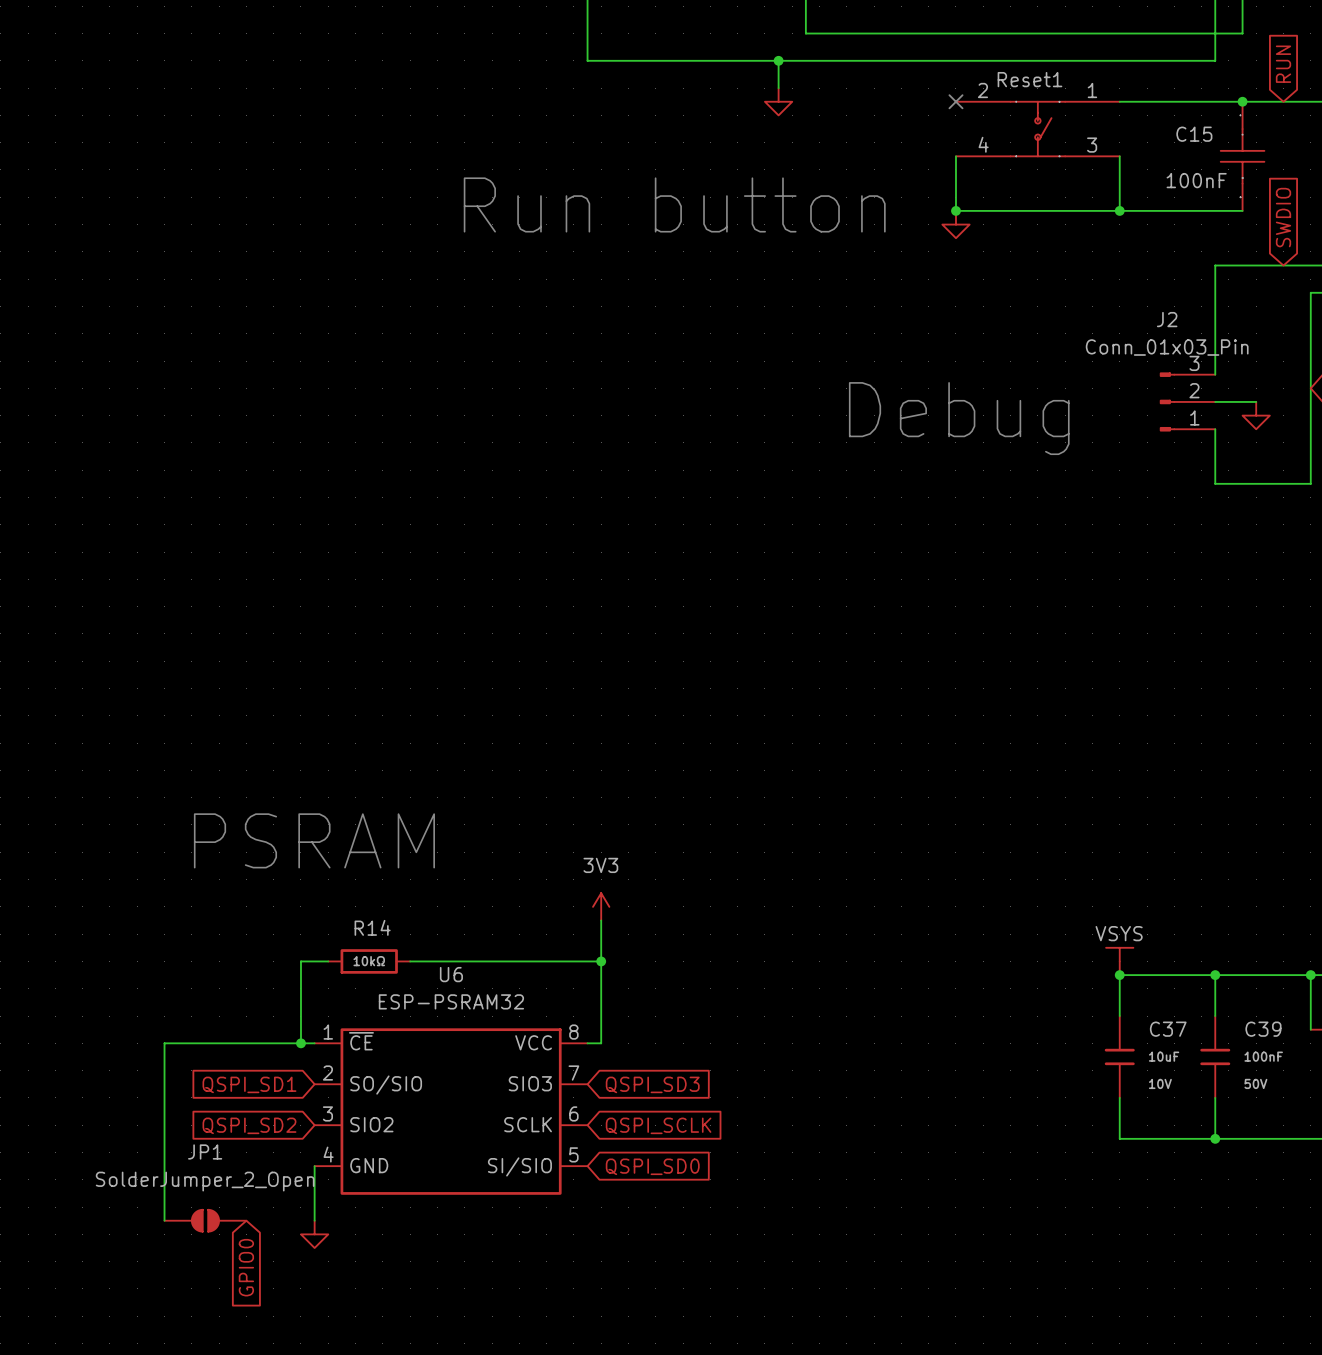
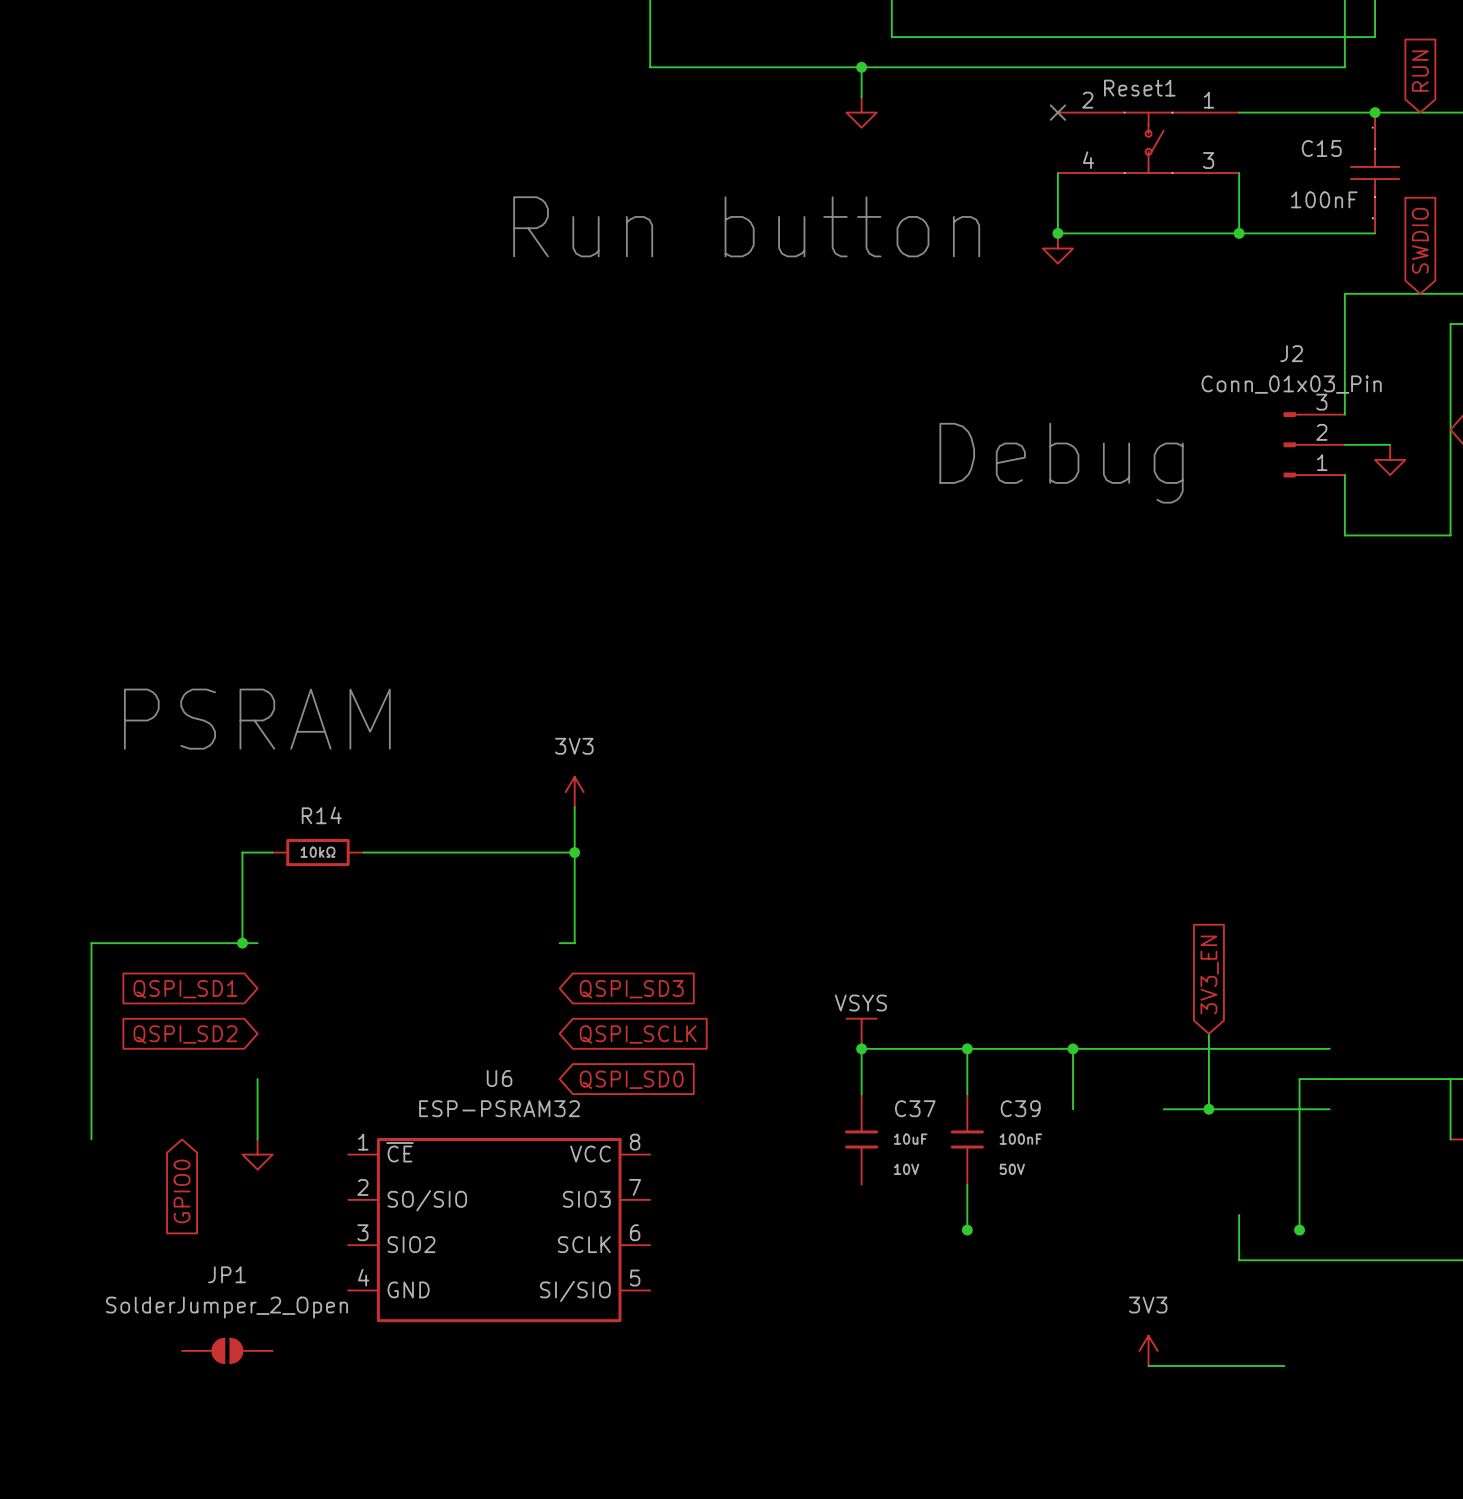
junction: none -> (574, 852)
text position: PSRAM (314, 840) -> PSRAM (257, 719)
junction: none -> (242, 943)
global label: none -> 3V3_EN (1209, 974)
power symbol position: 3V3 (601, 906) -> 3V3 (574, 792)
wire: (601, 920) (601, 1043) (587, 1043) -> (574, 807) (574, 943) (559, 943)
power symbol: none -> VSYS (861, 1033)
wire: none -> (1208, 1033) (1208, 1109)
junction: none -> (861, 1048)
wire: none -> (967, 1048) (967, 1094)
junction: none -> (967, 1048)
wire: none -> (1073, 1048) (1073, 1109)
junction: none -> (1073, 1048)
wire: none -> (1329, 1048) (861, 1048) (861, 1094)
wire: (328, 961) (300, 961) (300, 1043) -> (272, 852) (242, 852) (242, 943)
R14 position: (369, 961) -> (317, 852)
wire: (410, 961) (601, 961) -> (363, 852) (574, 852)
junction: (601, 961) -> none
power symbol: VSYS (1119, 961) -> none
junction position: (1119, 975) -> (1208, 1109)
wire: (1174, 975) (1119, 975) (1119, 1016) -> (1299, 1079) (1299, 1230)
wire: (1215, 975) (1215, 1016) -> none
junction: (1215, 975) -> none
junction: (1310, 975) -> none
wire: none -> (1163, 1109) (1329, 1109)
junction: (300, 1043) -> none
wire: (314, 1043) (164, 1043) (164, 1220) -> (257, 943) (91, 943) (91, 1139)
C37 position: (1119, 1056) -> (861, 1139)
C39 position: (1215, 1056) -> (967, 1139)
wire: none -> (967, 1184) (967, 1230)
global label position: QSPI_SD1 (249, 1084) -> QSPI_SD1 (185, 989)
global label position: QSPI_SD3 (652, 1084) -> QSPI_SD3 (631, 989)
wire: (1215, 1097) (1215, 1138) -> none
junction: none -> (967, 1230)
global label position: QSPI_SD2 (249, 1125) -> QSPI_SD2 (185, 1034)
global label position: QSPI_SCLK (658, 1125) -> QSPI_SCLK (638, 1034)
junction position: (1215, 1138) -> (1299, 1230)
wire: (314, 1166) (314, 1220) -> (257, 1079) (257, 1139)
global label position: QSPI_SD0 (652, 1166) -> QSPI_SD0 (631, 1079)
power symbol: none -> 3V3 (1148, 1350)
power symbol position: (314, 1234) -> (257, 1154)
wire: none -> (1148, 1365) (1284, 1365)
global label position: GPIO0 (246, 1267) -> GPIO0 (182, 1191)

